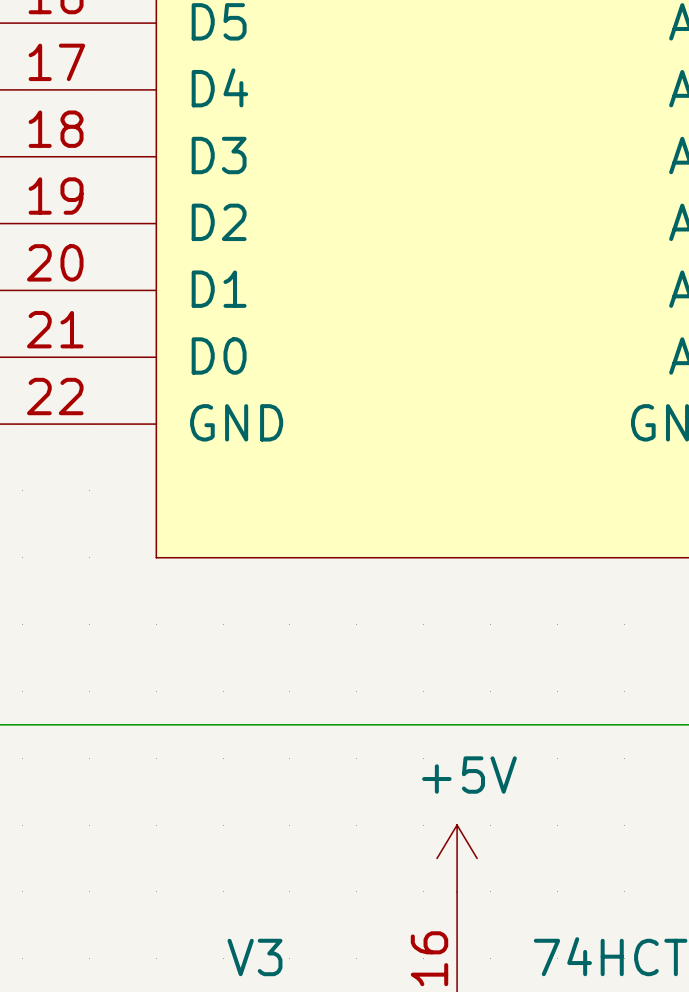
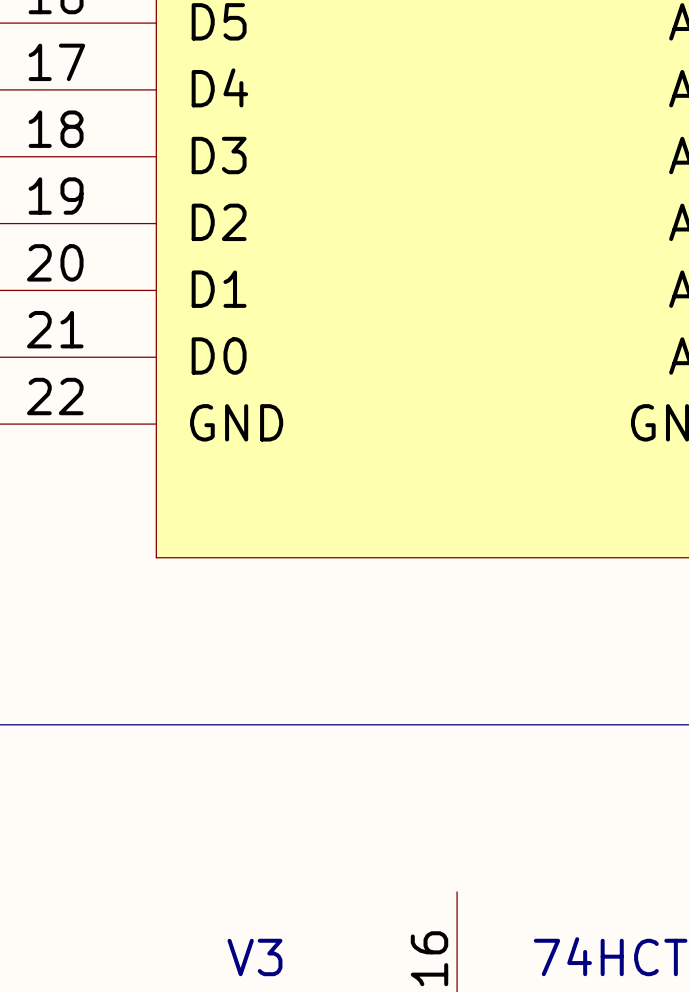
power symbol: +5V (457, 858) -> none

